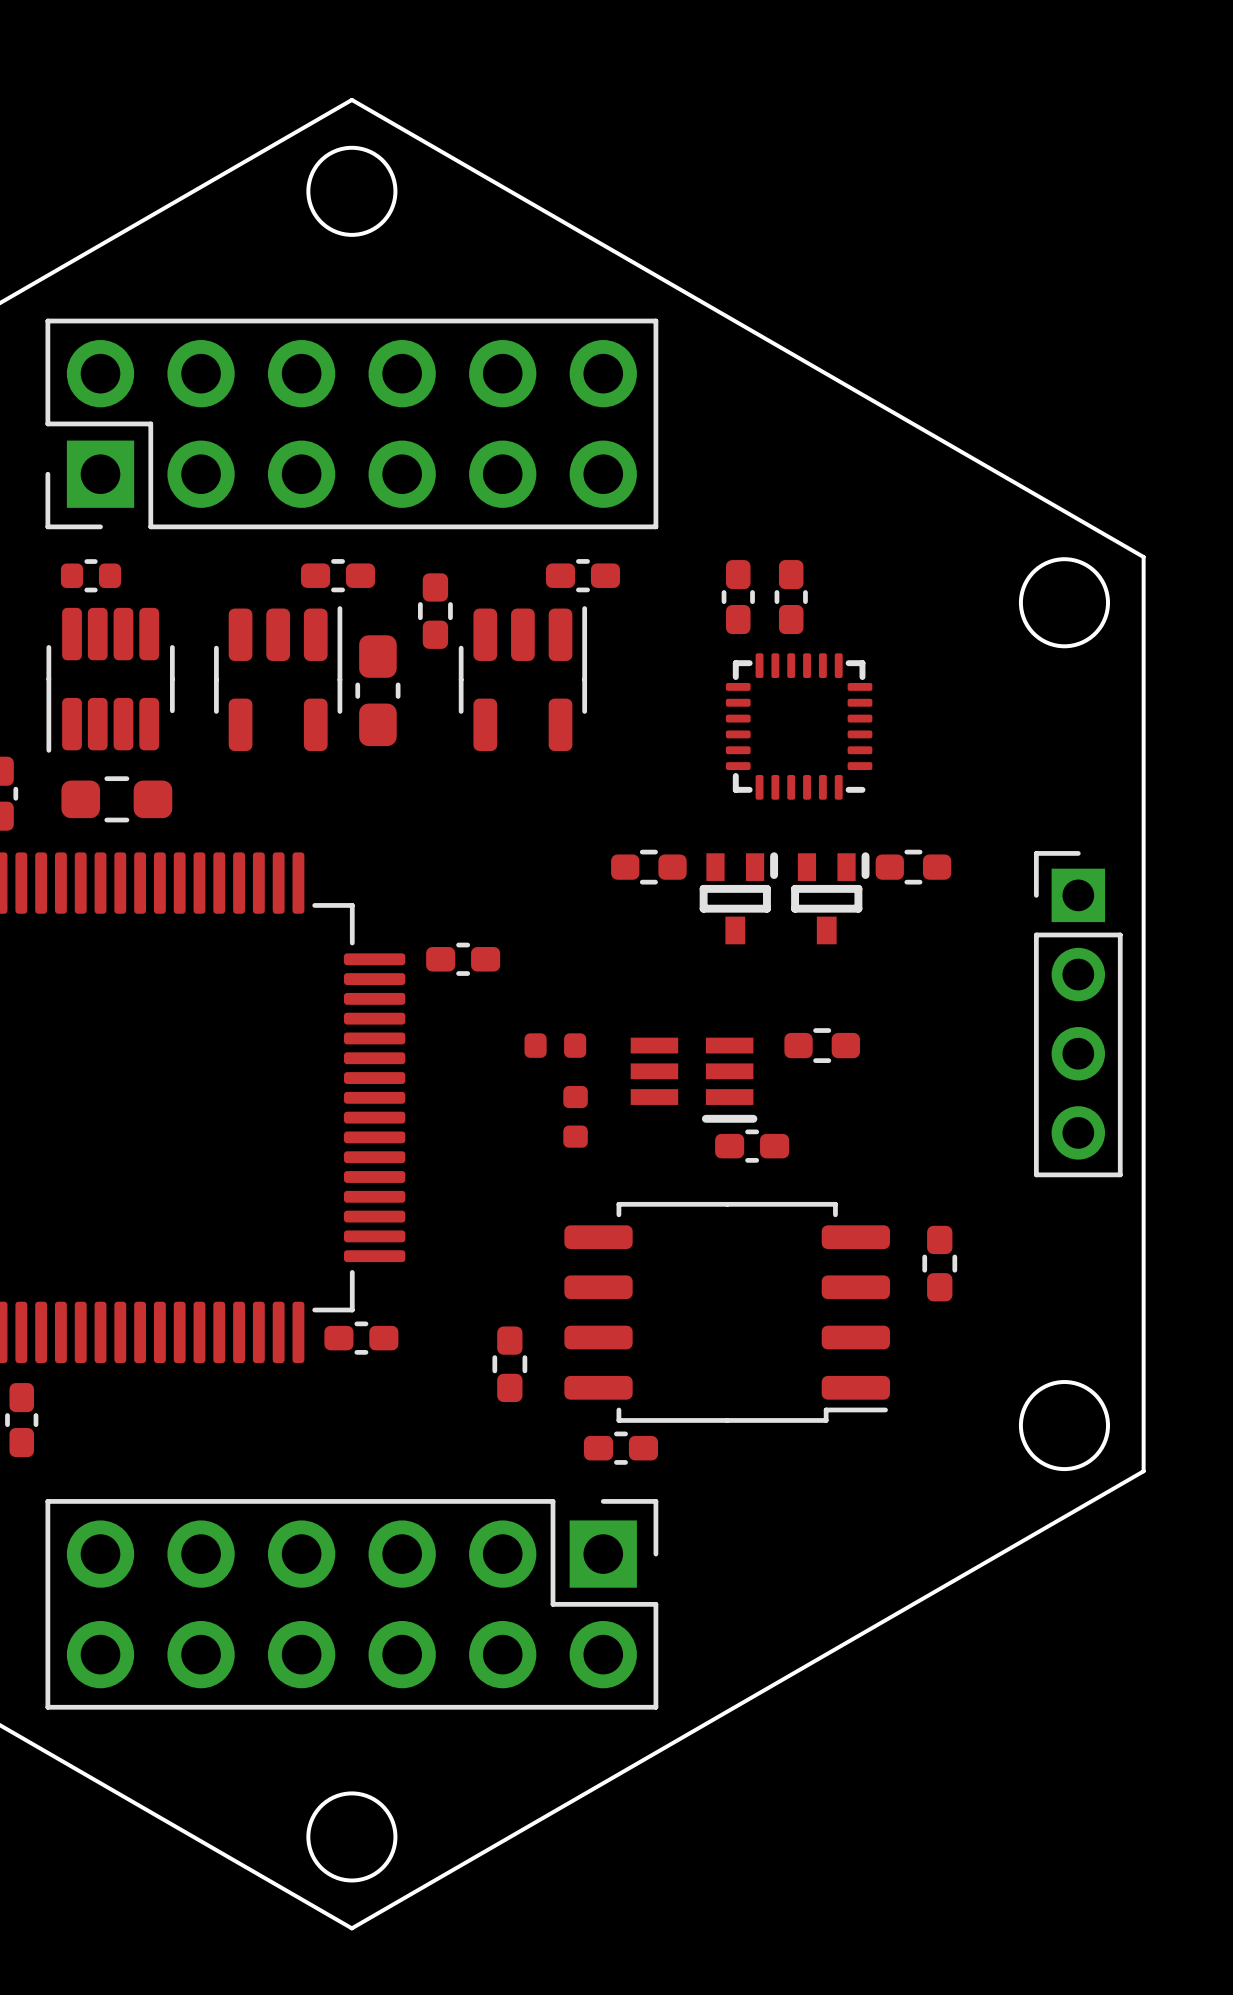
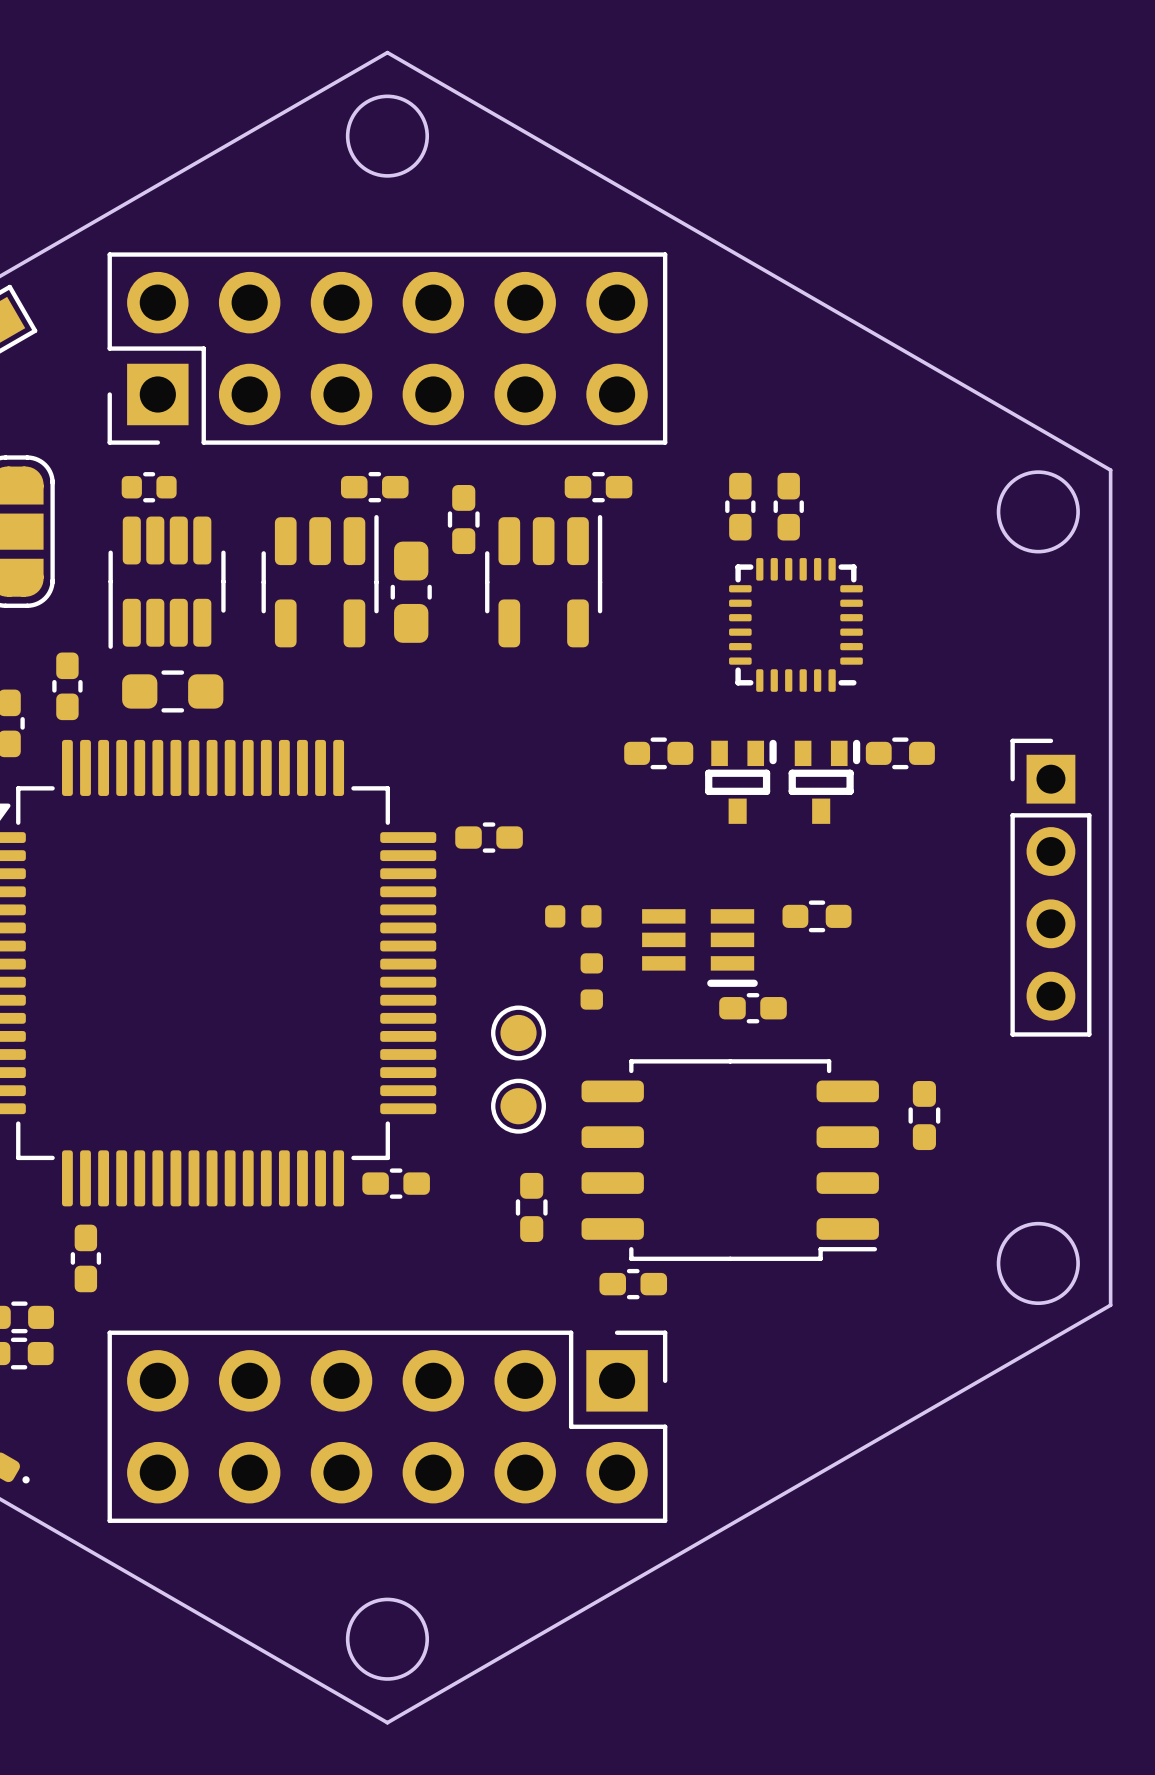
part: none -> (518, 1032)
part: none -> (518, 1106)

